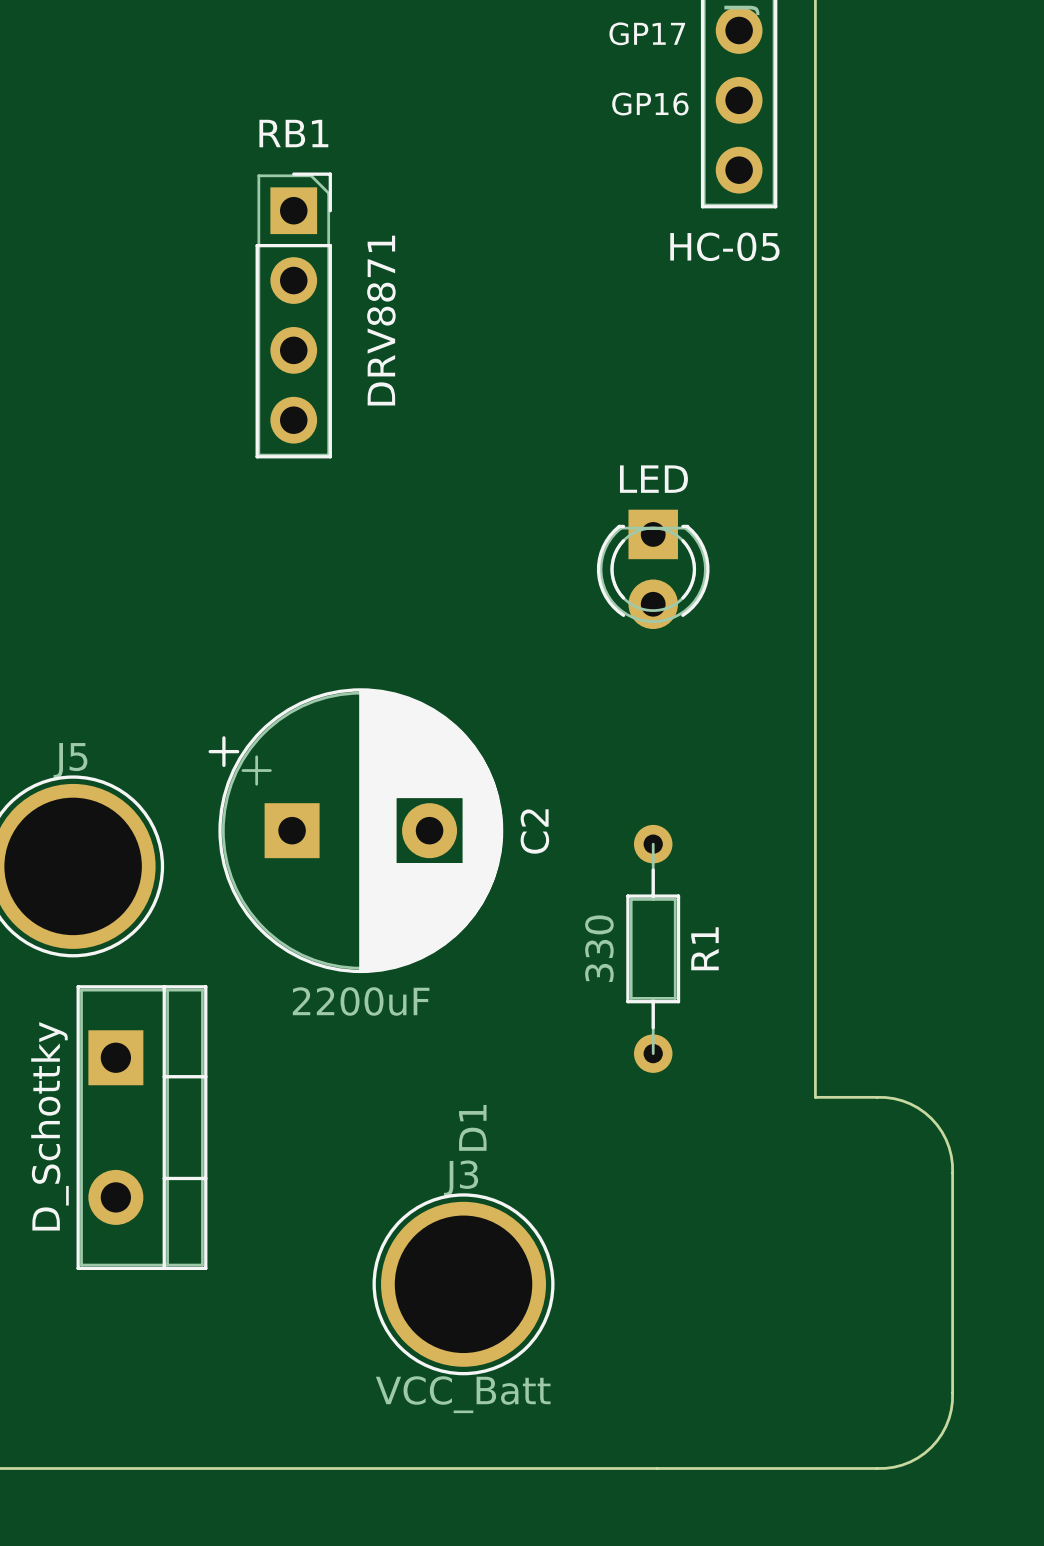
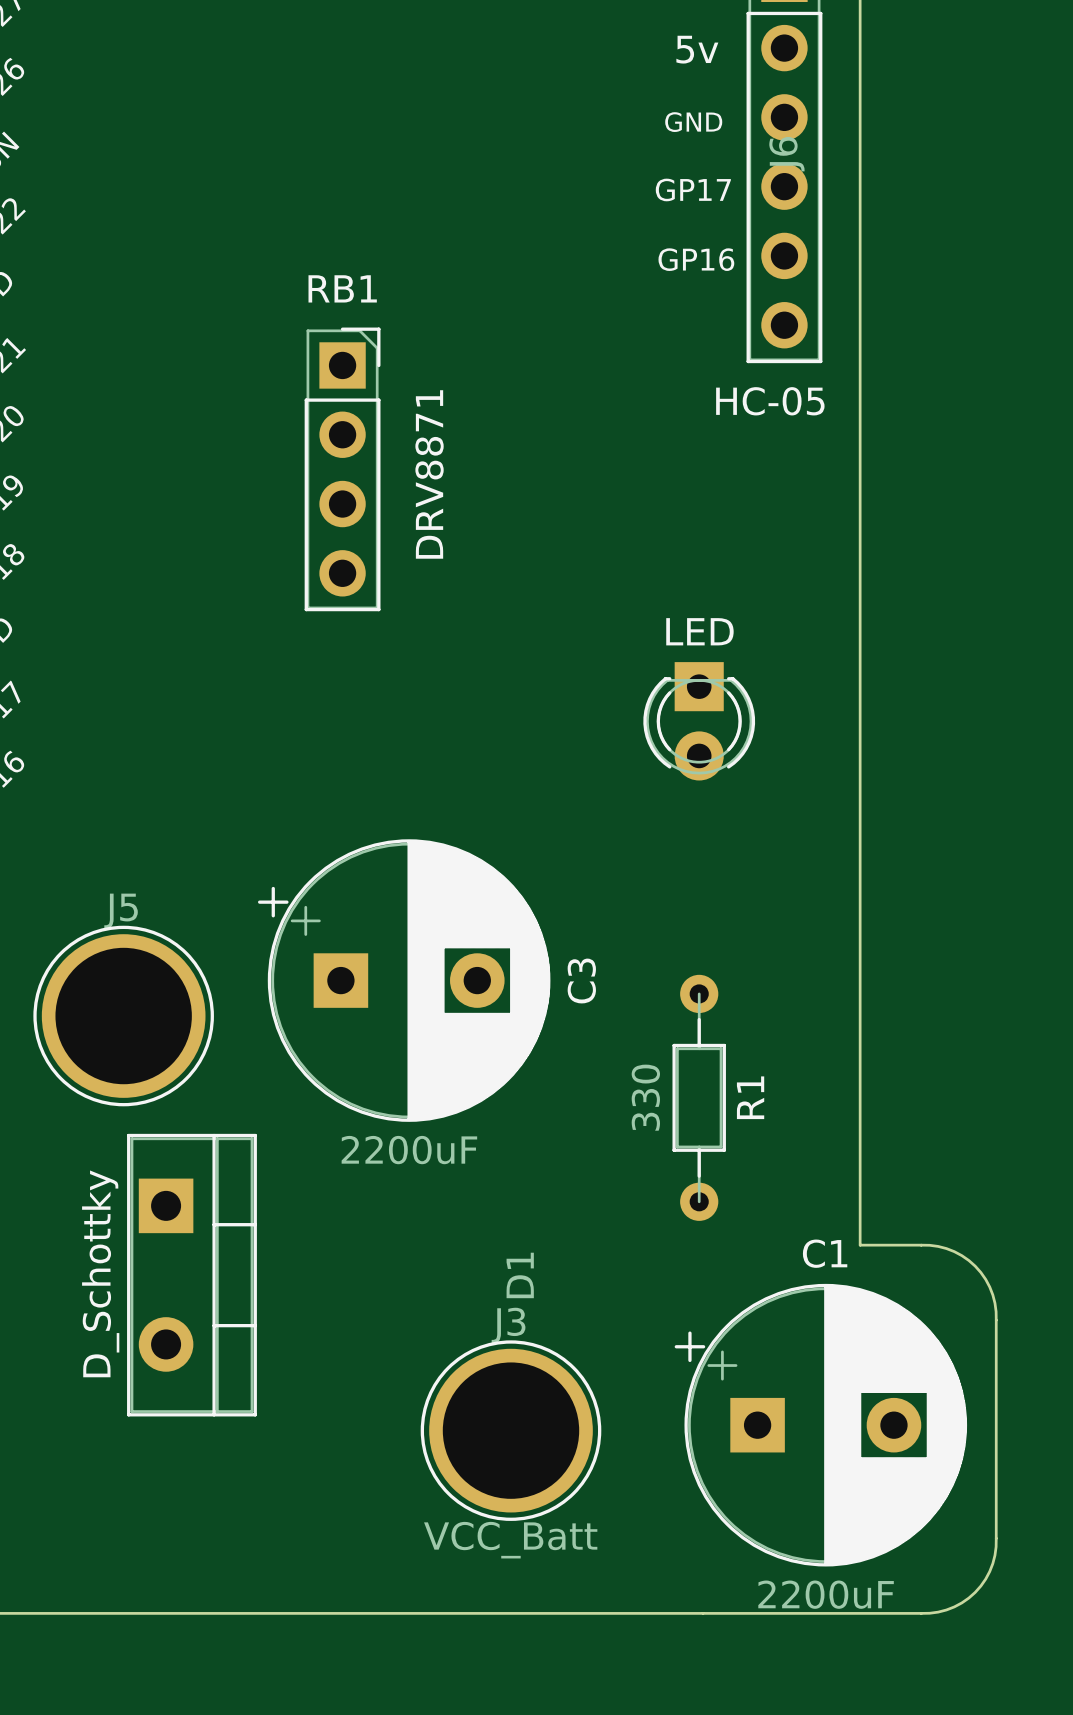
C2 name: C2 (534, 831) -> C3 (581, 981)
C1: none -> 2200uF (820, 1425)

